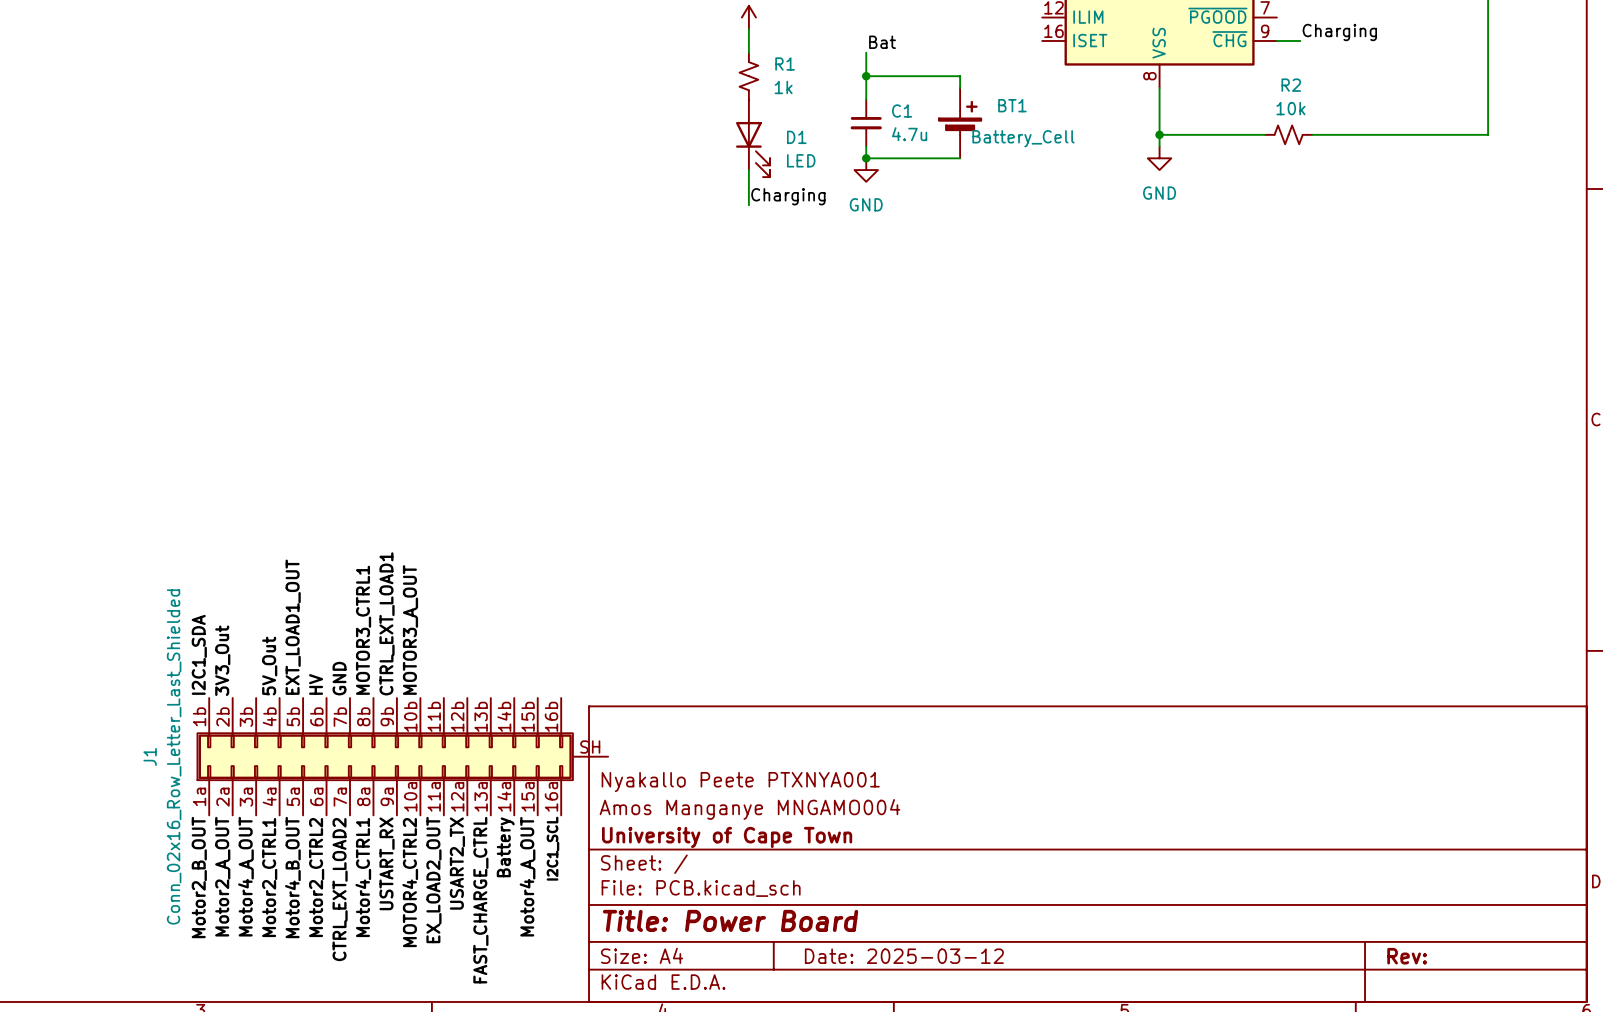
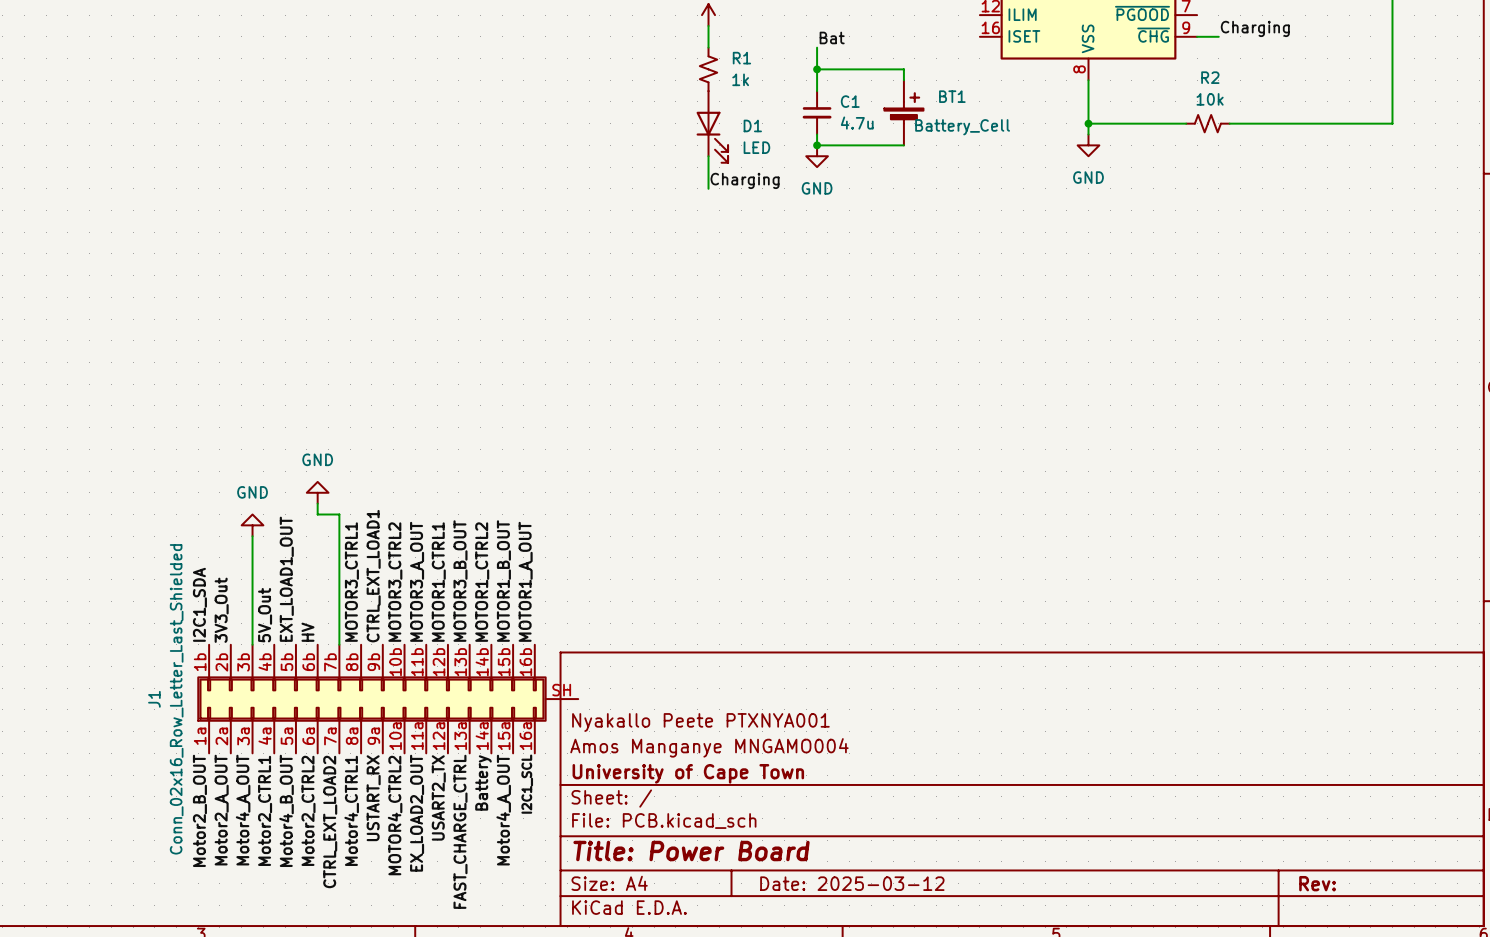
power symbol: none -> GND (317, 492)
wire: none -> (317, 503) (317, 514) (339, 514) (339, 644)
power symbol: none -> GND (252, 525)
wire: none -> (252, 536) (252, 644)
label: none -> MOTOR3_B_OUT (460, 581)
label: none -> MOTOR1_B_OUT (503, 581)
label: MOTOR3_A_OUT (410, 630) -> MOTOR3_CTRL2 (395, 582)
label: none -> MOTOR3_A_OUT (417, 581)
label: none -> MOTOR1_CTRL1 (438, 582)
label: none -> MOTOR1_CTRL2 (482, 582)
label: none -> MOTOR1_A_OUT (525, 581)
label: GND (339, 678) -> none

